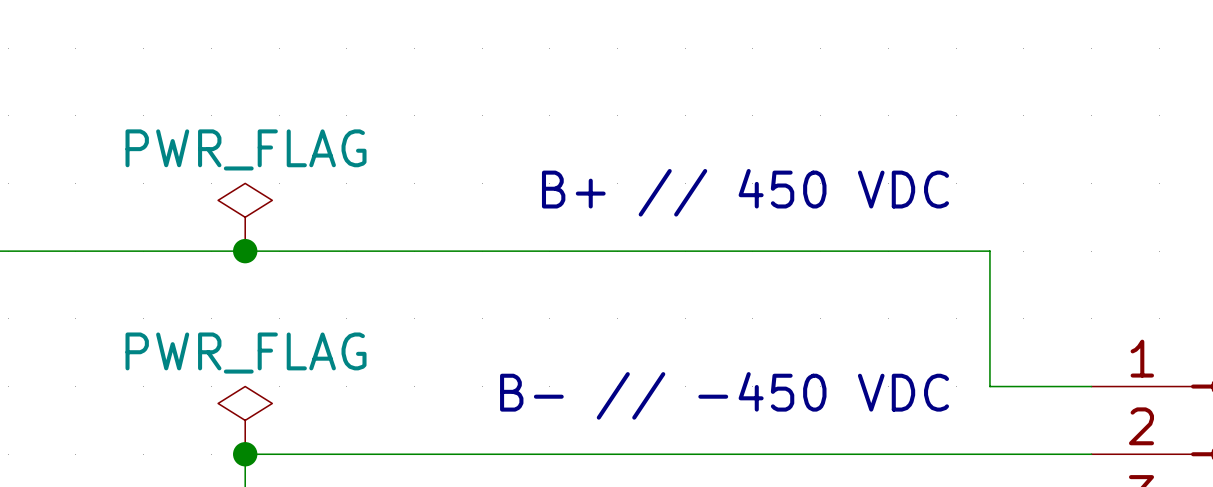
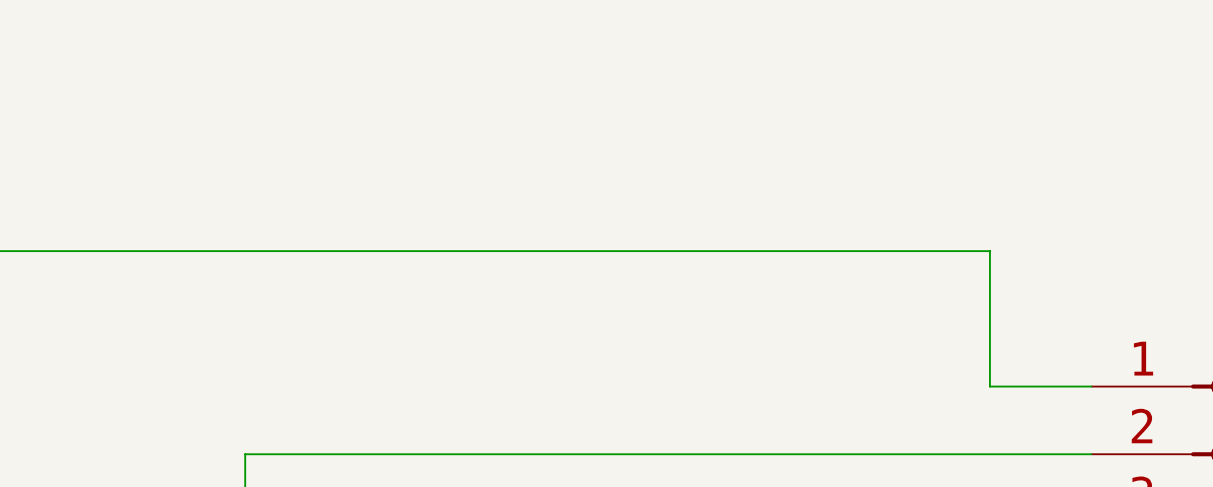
text: B+ // 450 VDC (745, 192) -> none
power symbol: PWR_FLAG (245, 217) -> none
junction: (245, 251) -> none
text: B- // -450 VDC (724, 395) -> none
power symbol: PWR_FLAG (245, 420) -> none
junction: (245, 454) -> none

